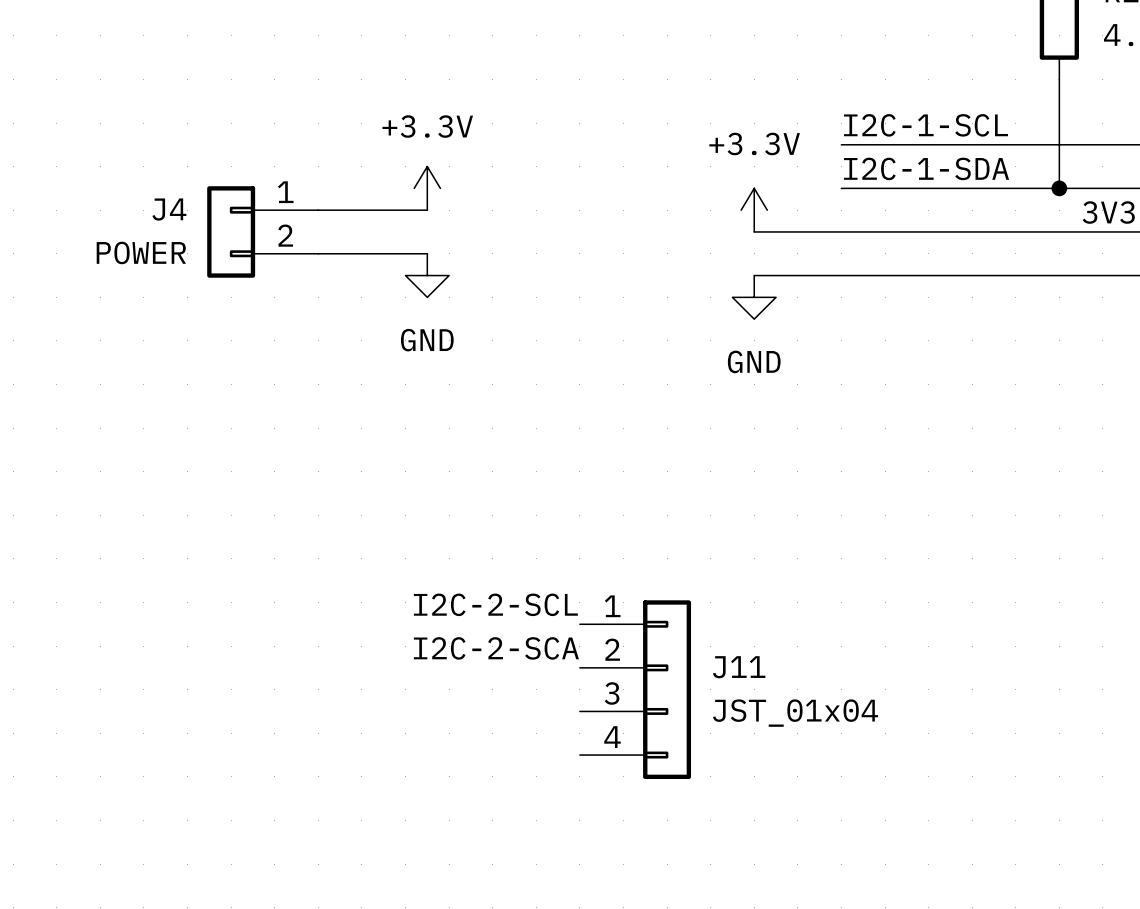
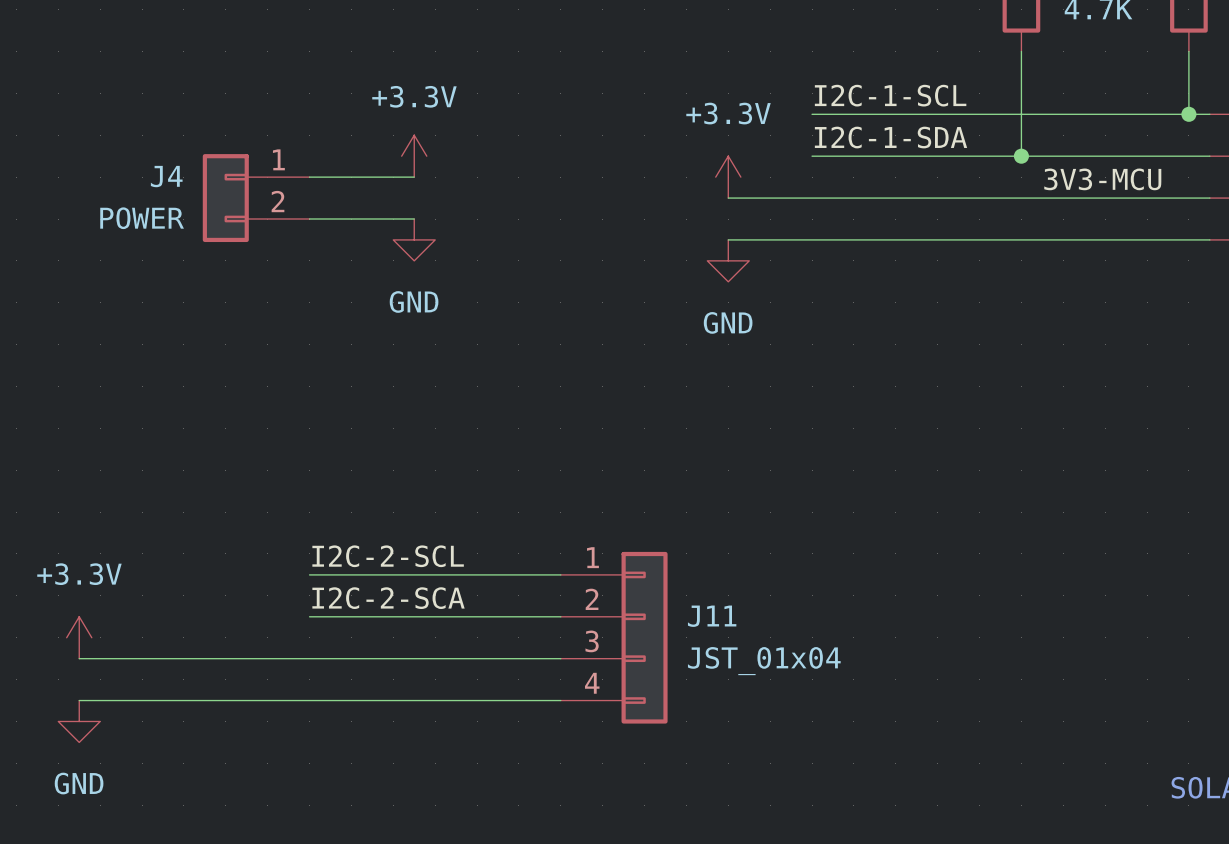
label position: I2C-2-SCL (495, 604) -> I2C-2-SCL (388, 556)
wire: none -> (309, 574) (560, 574)
label position: I2C-2-SCA (496, 648) -> I2C-2-SCA (388, 598)
wire: none -> (309, 616) (560, 616)
power symbol: none -> +3.3V (79, 637)
wire: none -> (79, 658) (560, 658)
wire: none -> (79, 700) (560, 700)
power symbol: none -> GND (79, 721)

